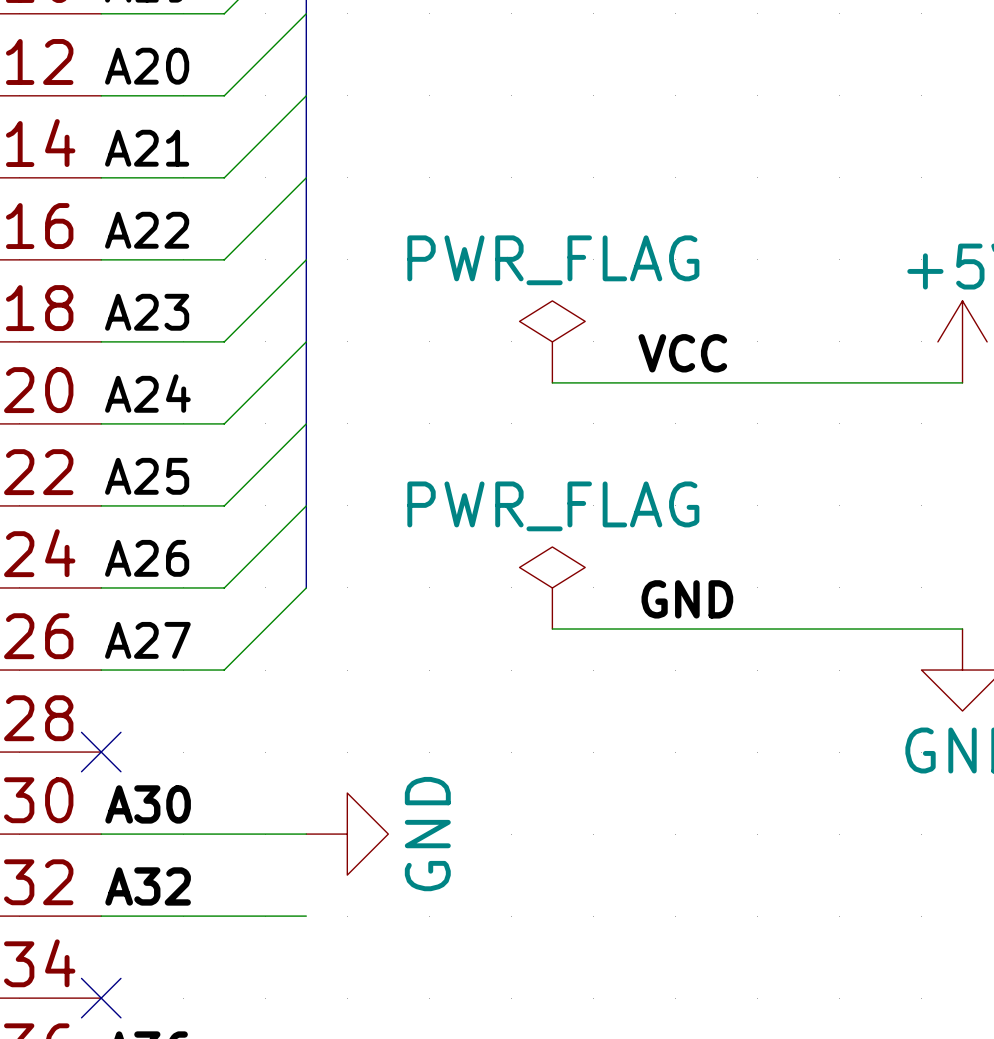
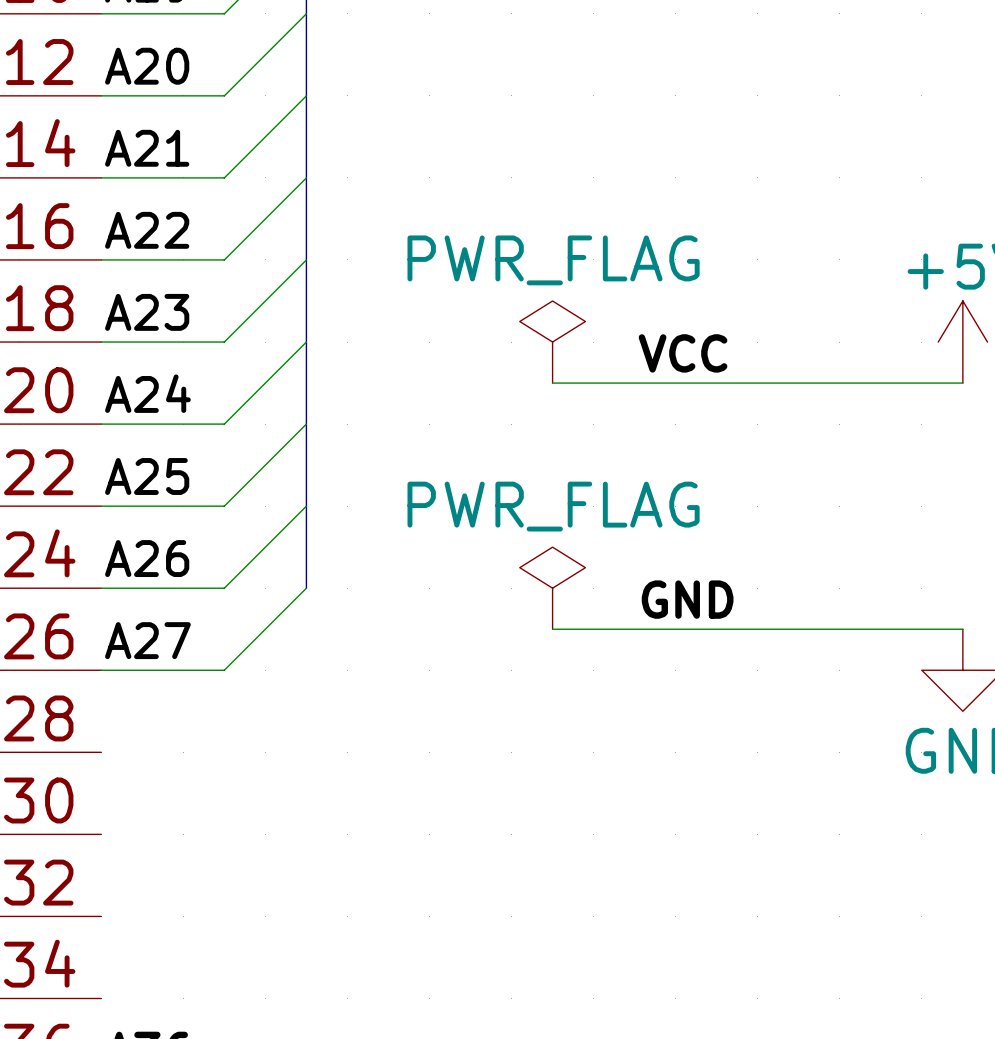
no-connect mark: (101, 752) -> none
label: A30 (148, 804) -> none
wire: (101, 834) (306, 834) -> none
power symbol: GND (347, 834) -> none
label: A32 (148, 886) -> none
wire: (101, 916) (306, 916) -> none
no-connect mark: (101, 998) -> none

